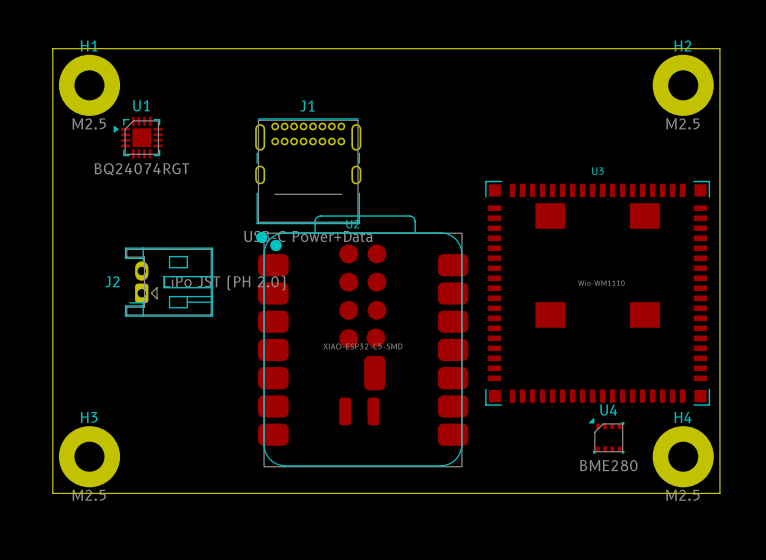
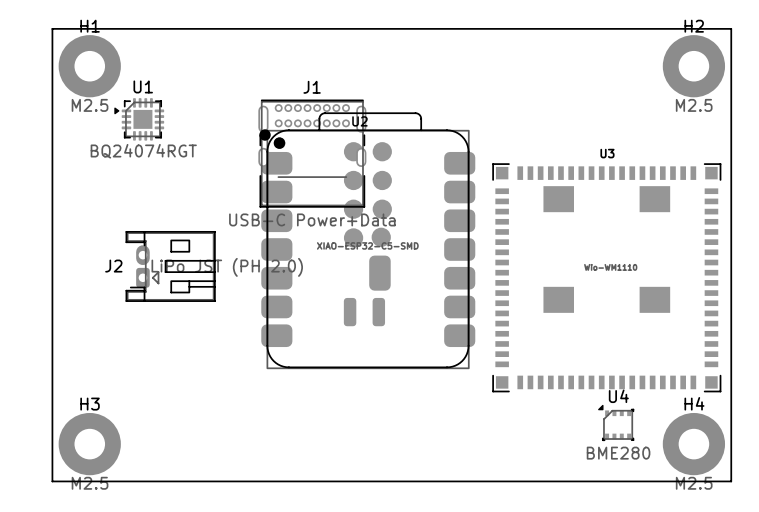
U2 position: (362, 341) -> (367, 240)

